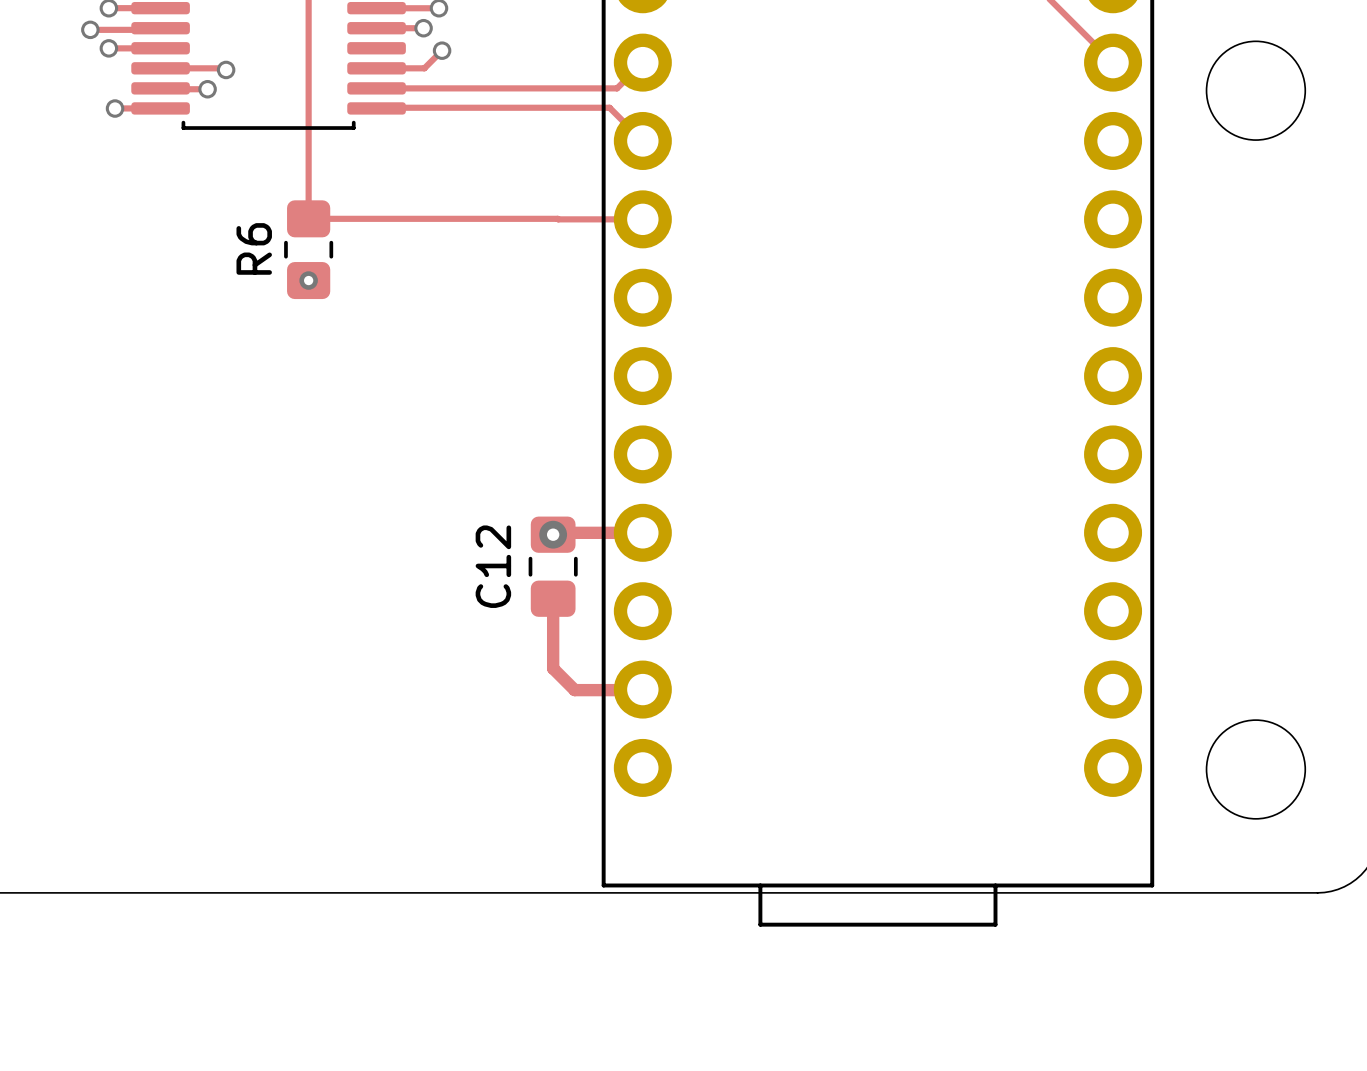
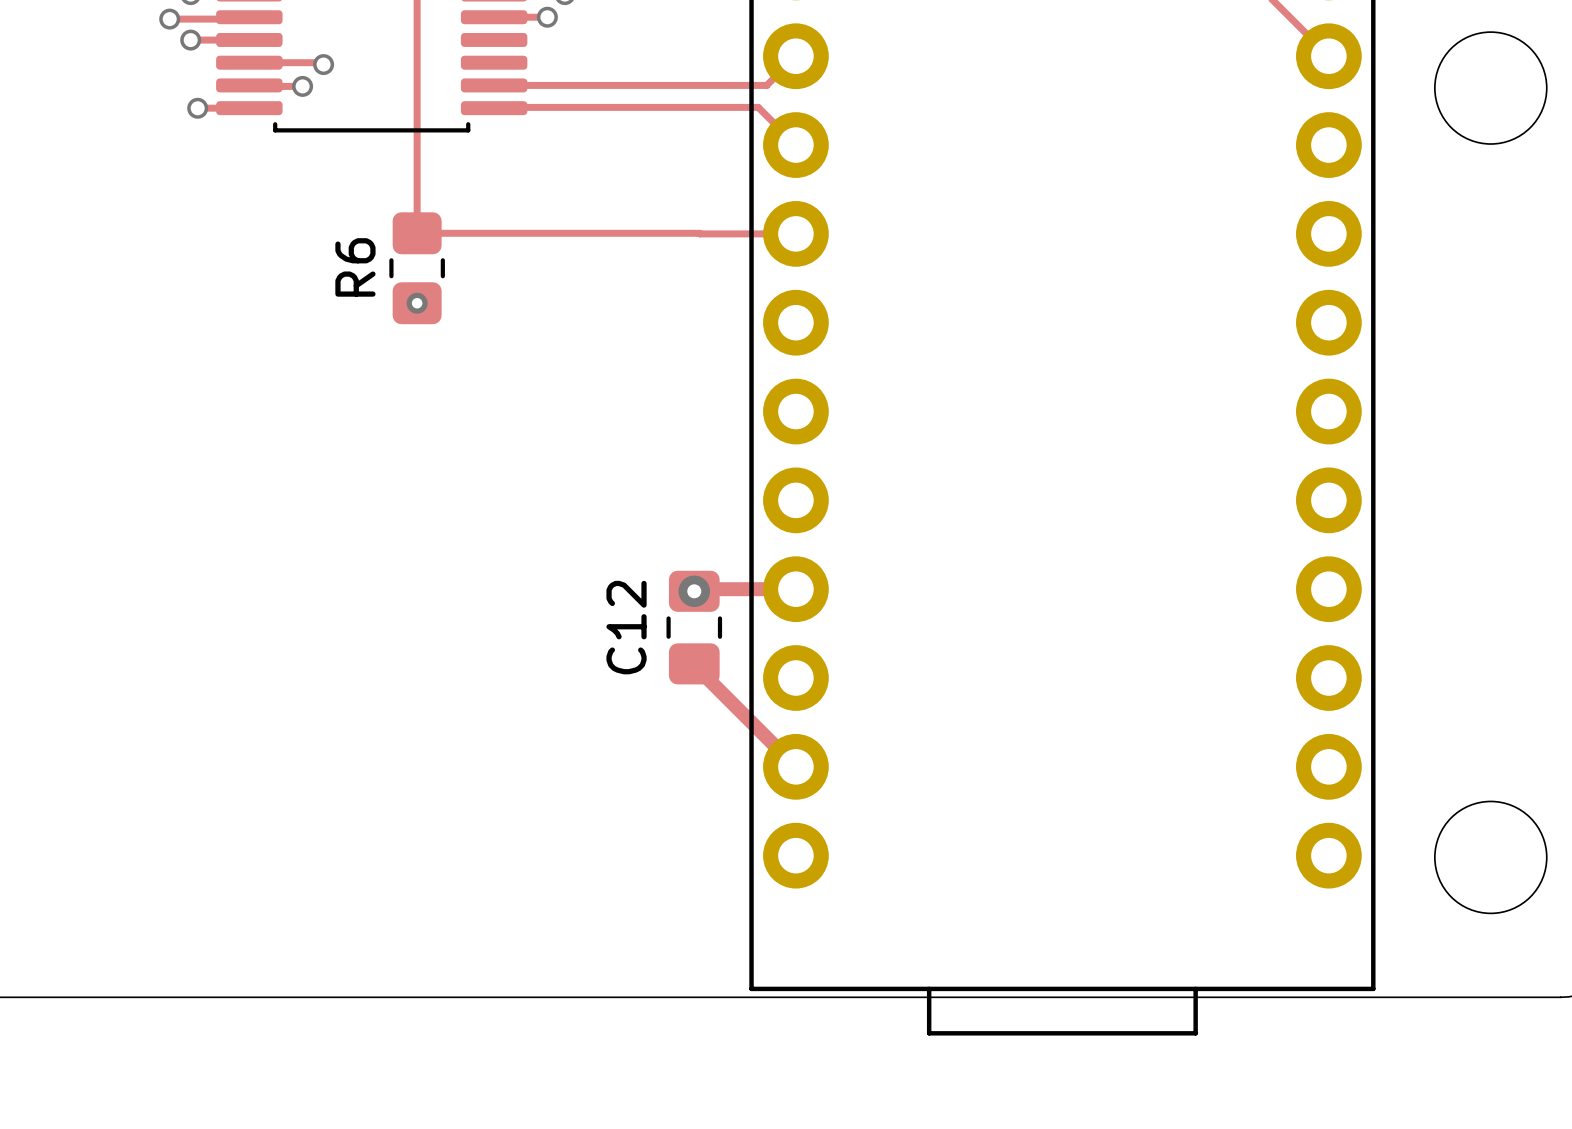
track: (442, 50) (424, 68) (376, 68) -> none
via: (442, 50) -> none
track: (553, 599) (553, 668) (574, 690) (642, 689) -> (694, 665) (795, 766)

